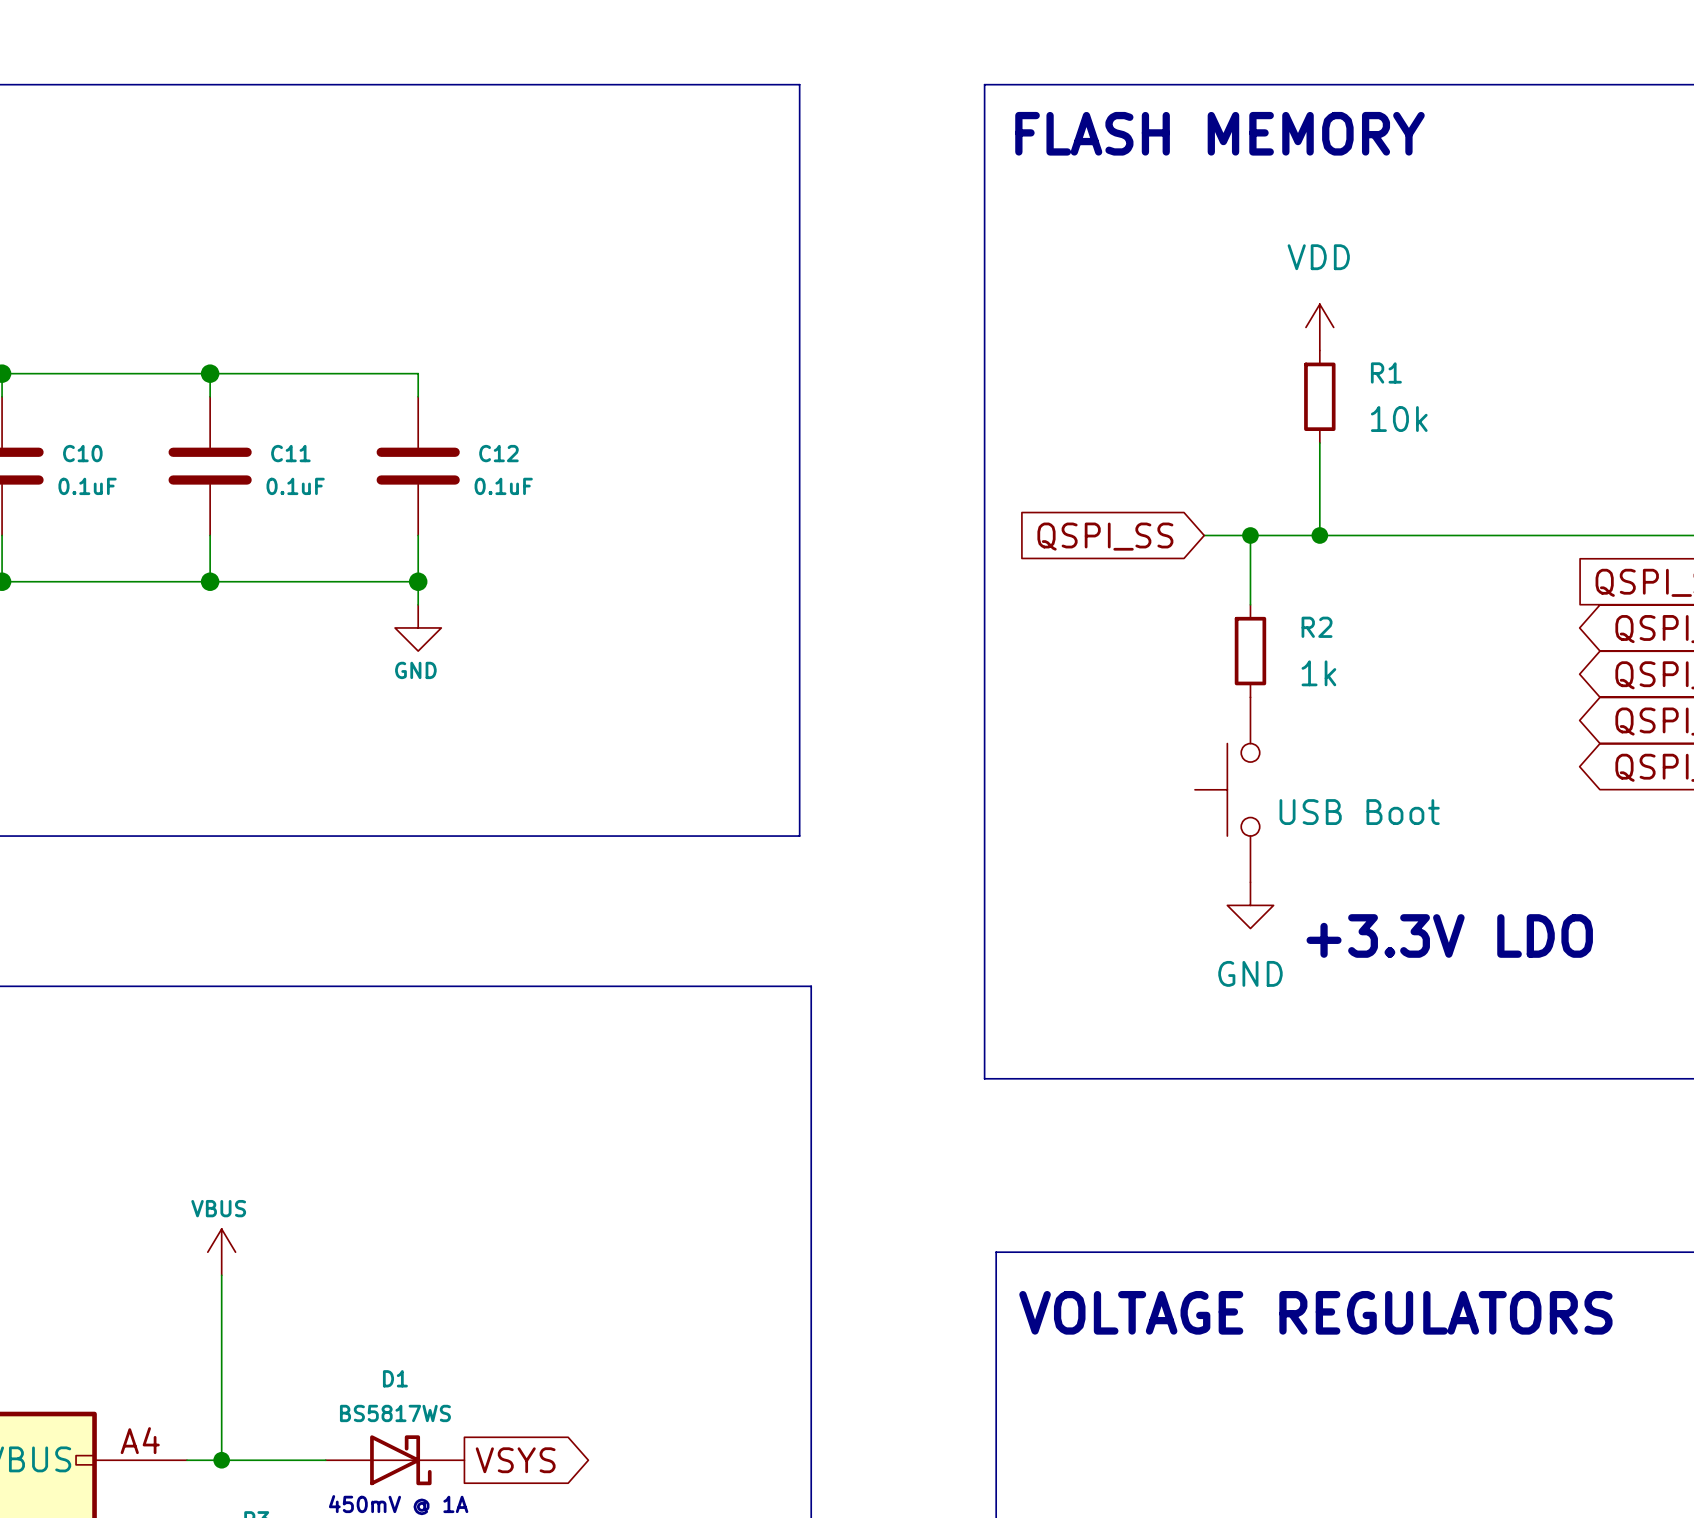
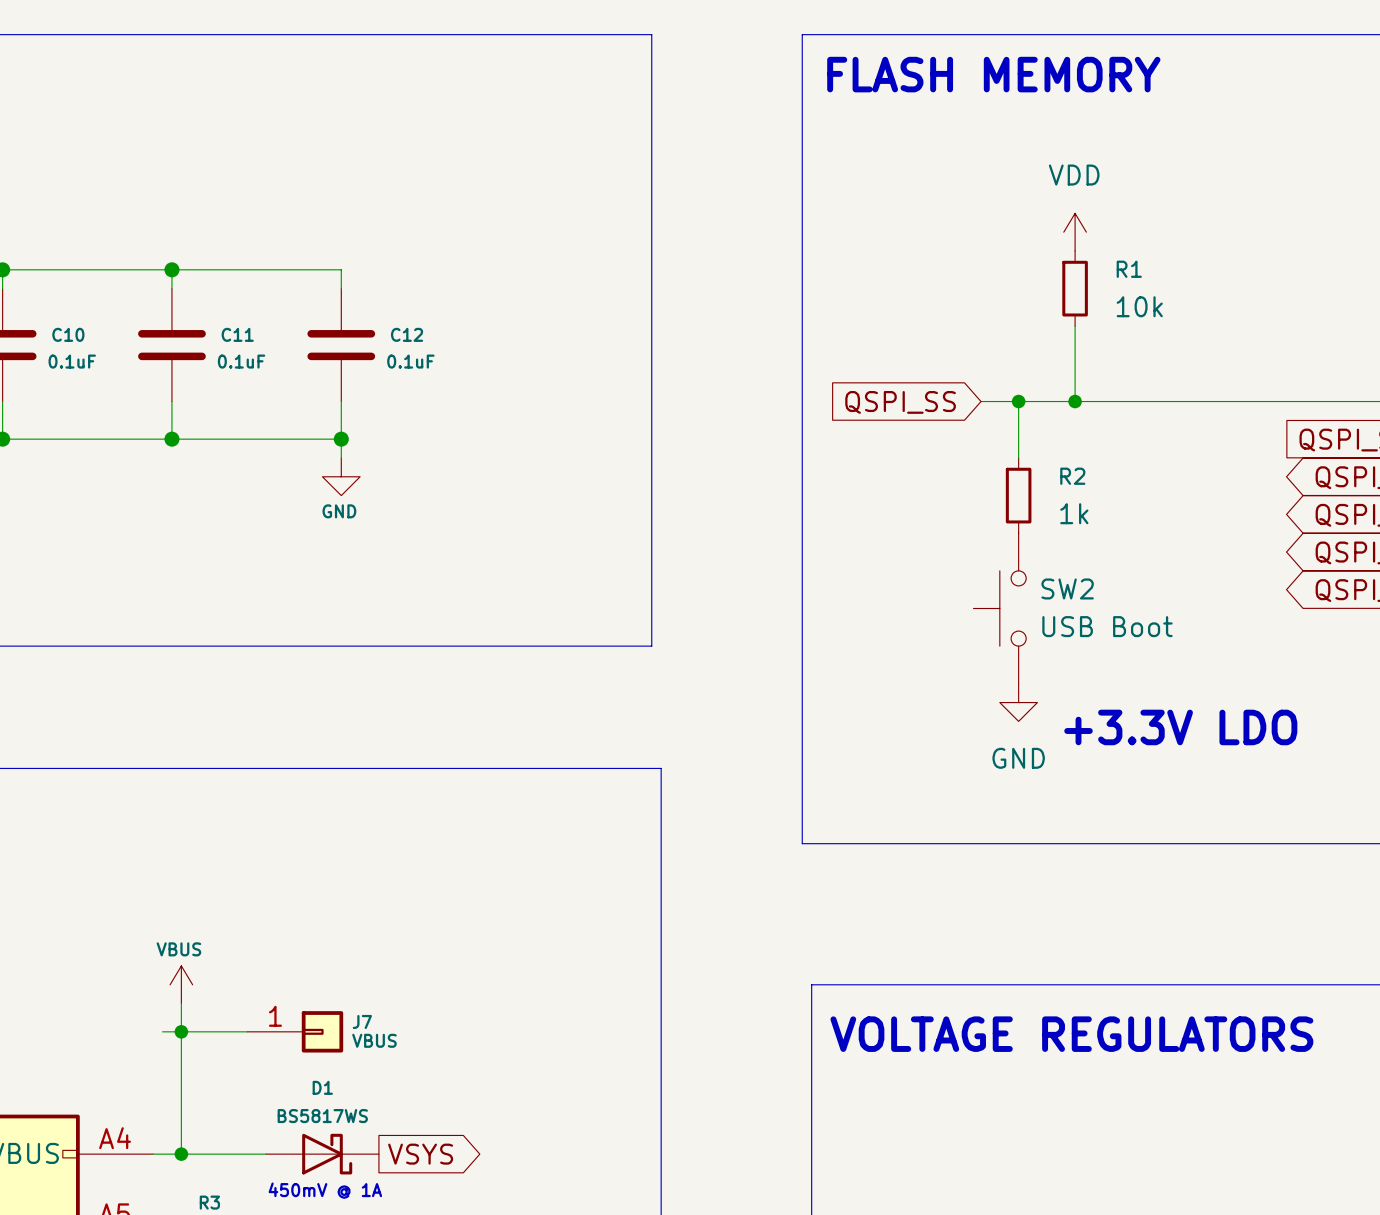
SW2 name: none -> SW2 (1067, 588)
wire: none -> (162, 1031) (247, 1031)
junction: none -> (181, 1031)
J7: none -> VBUS (295, 1031)

